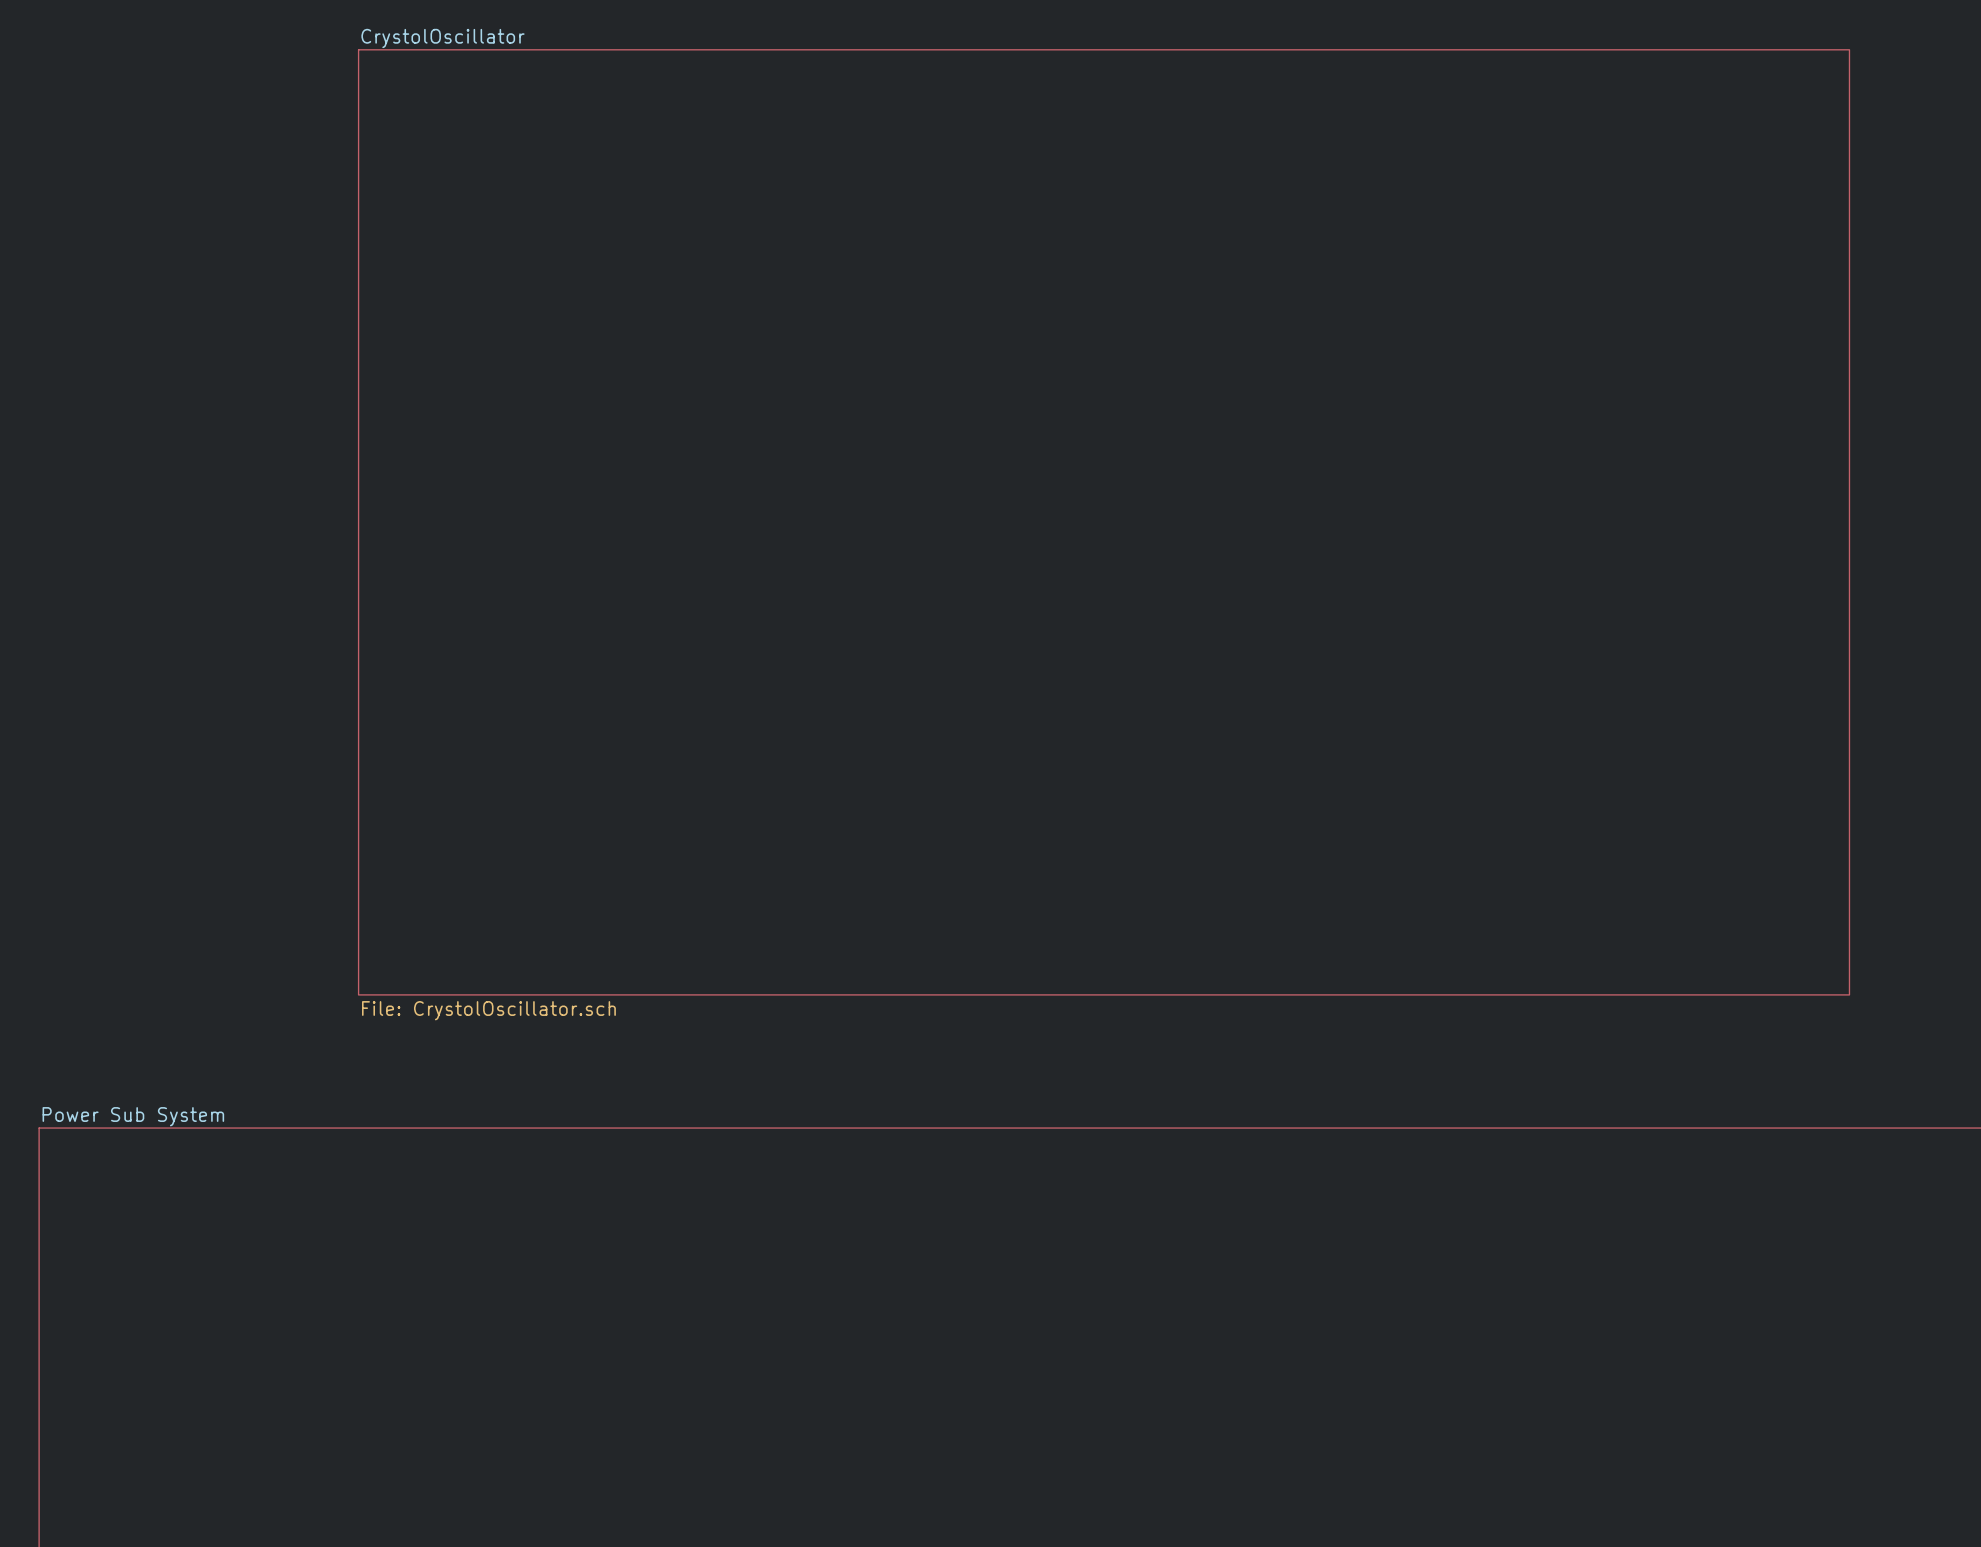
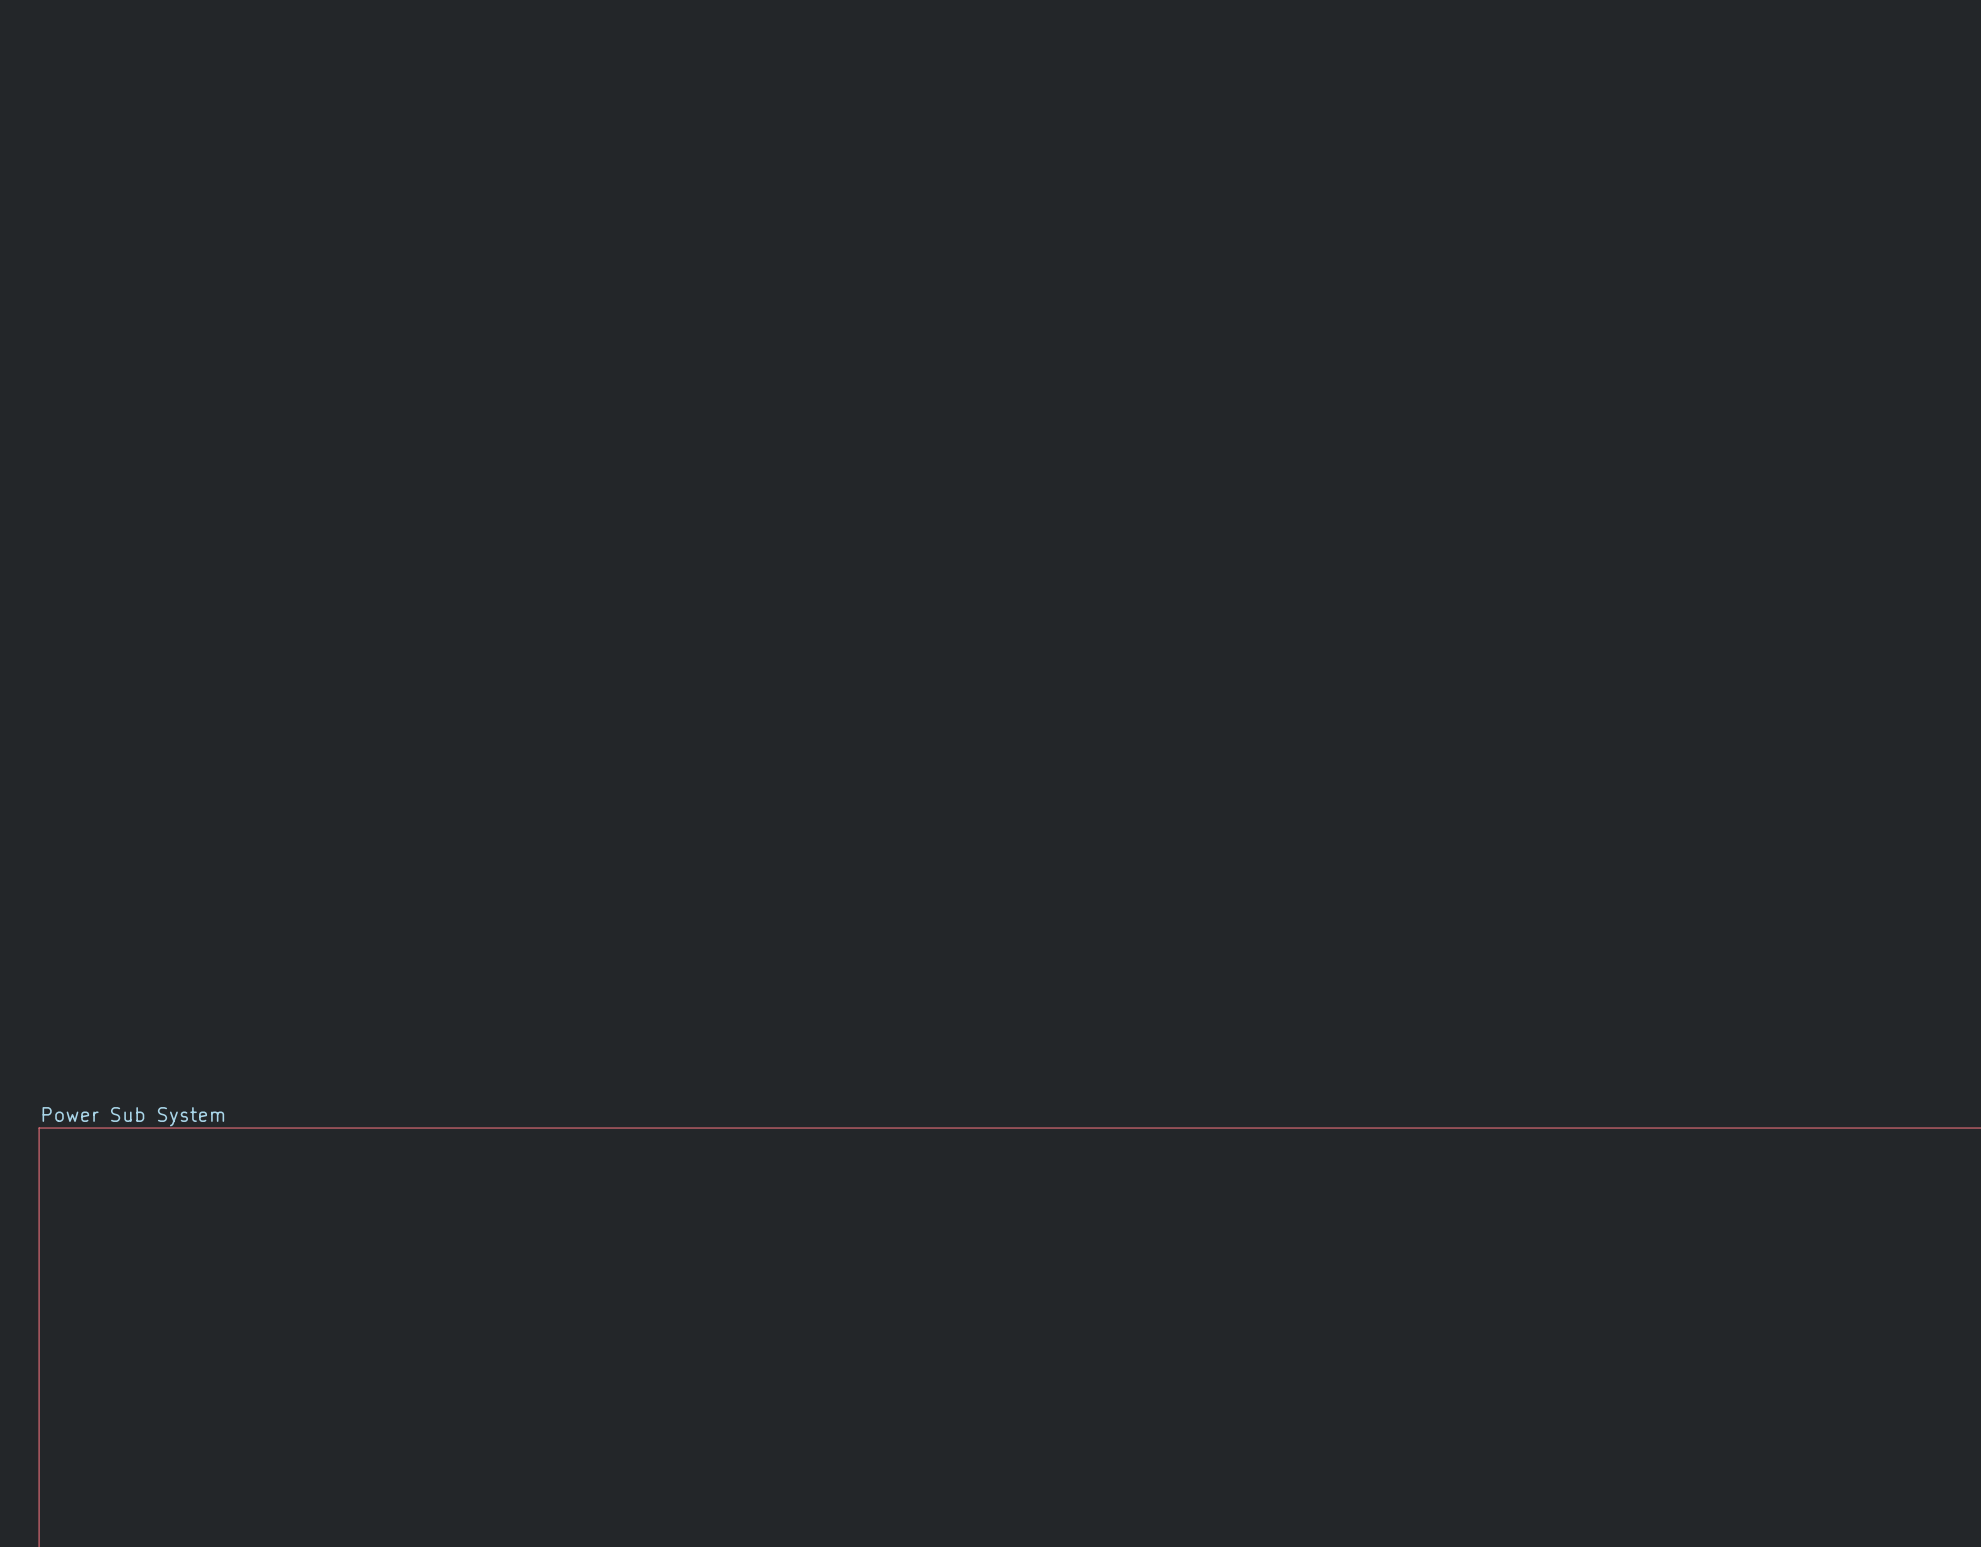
sheet CrystolOscillator: File: CrystolOscillator.sch (1104, 522) -> none

